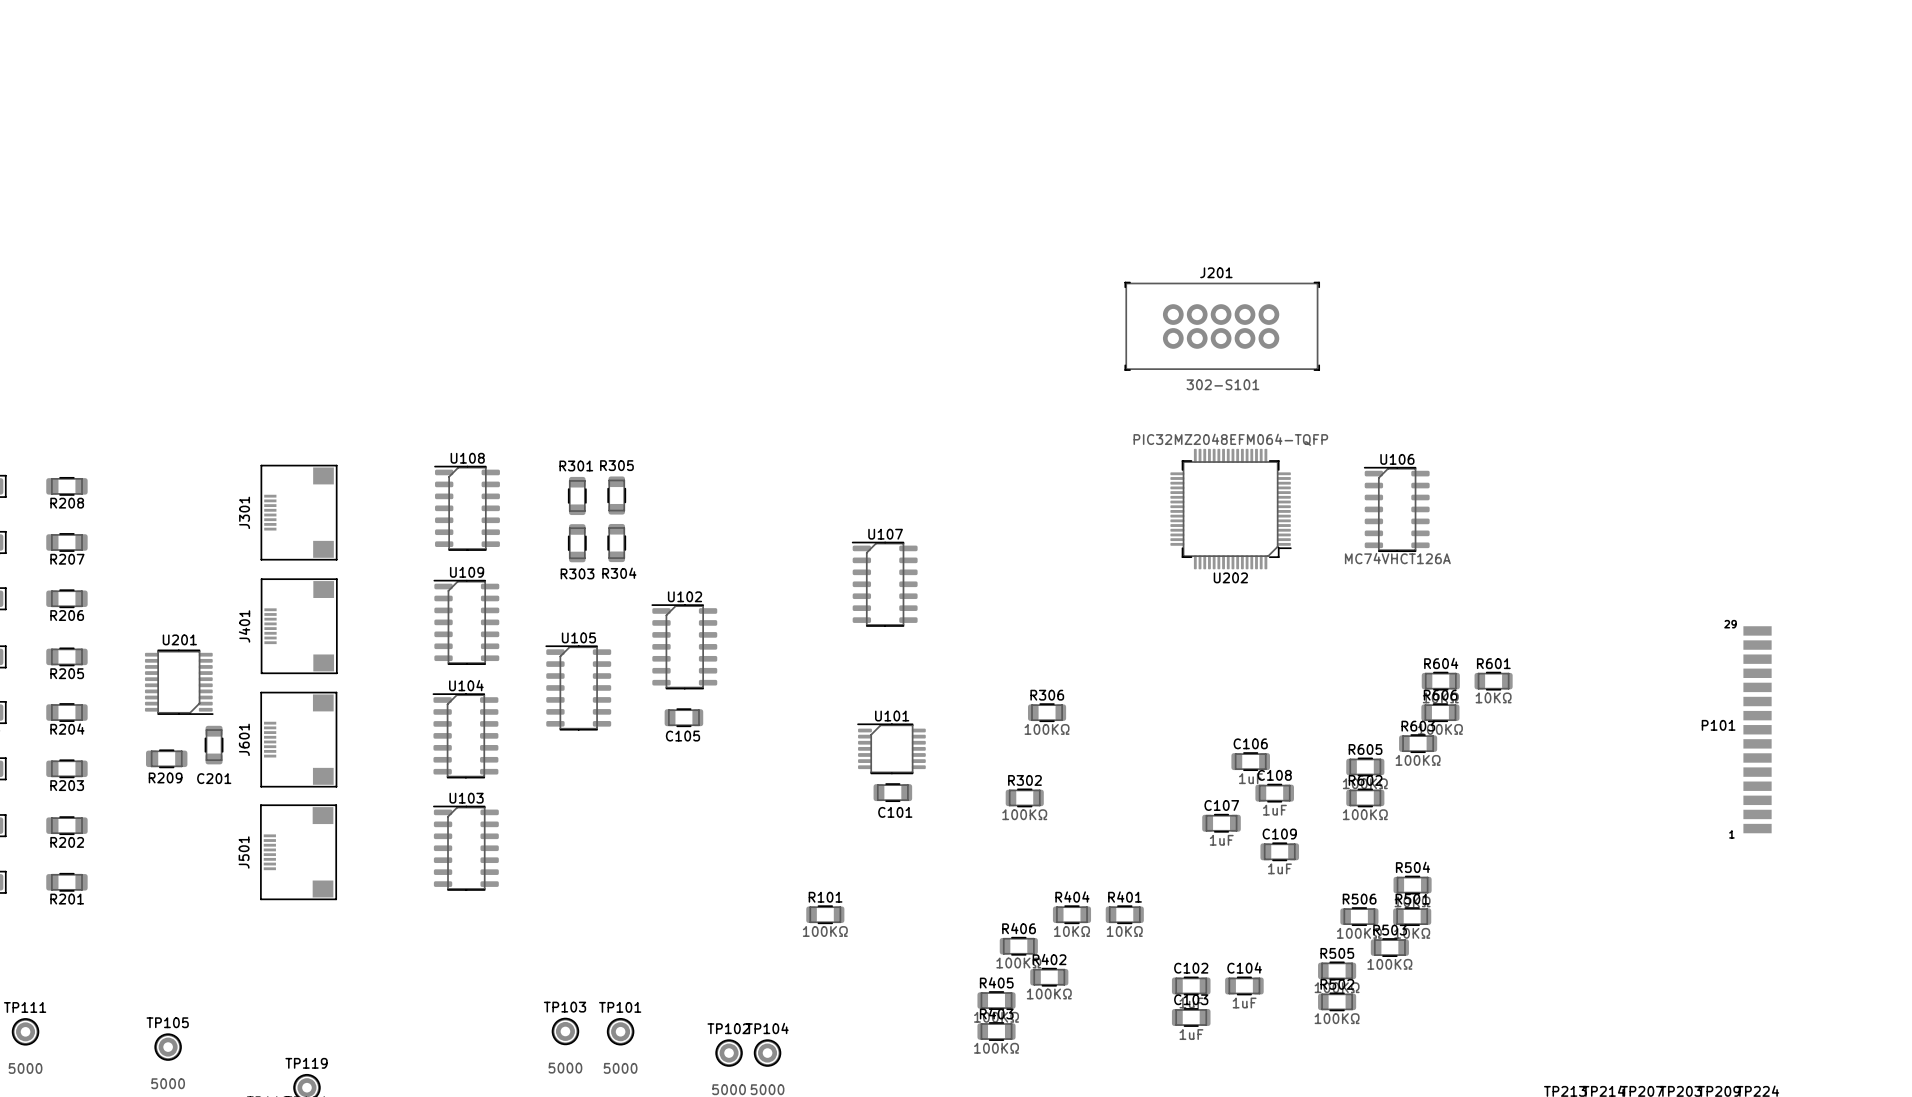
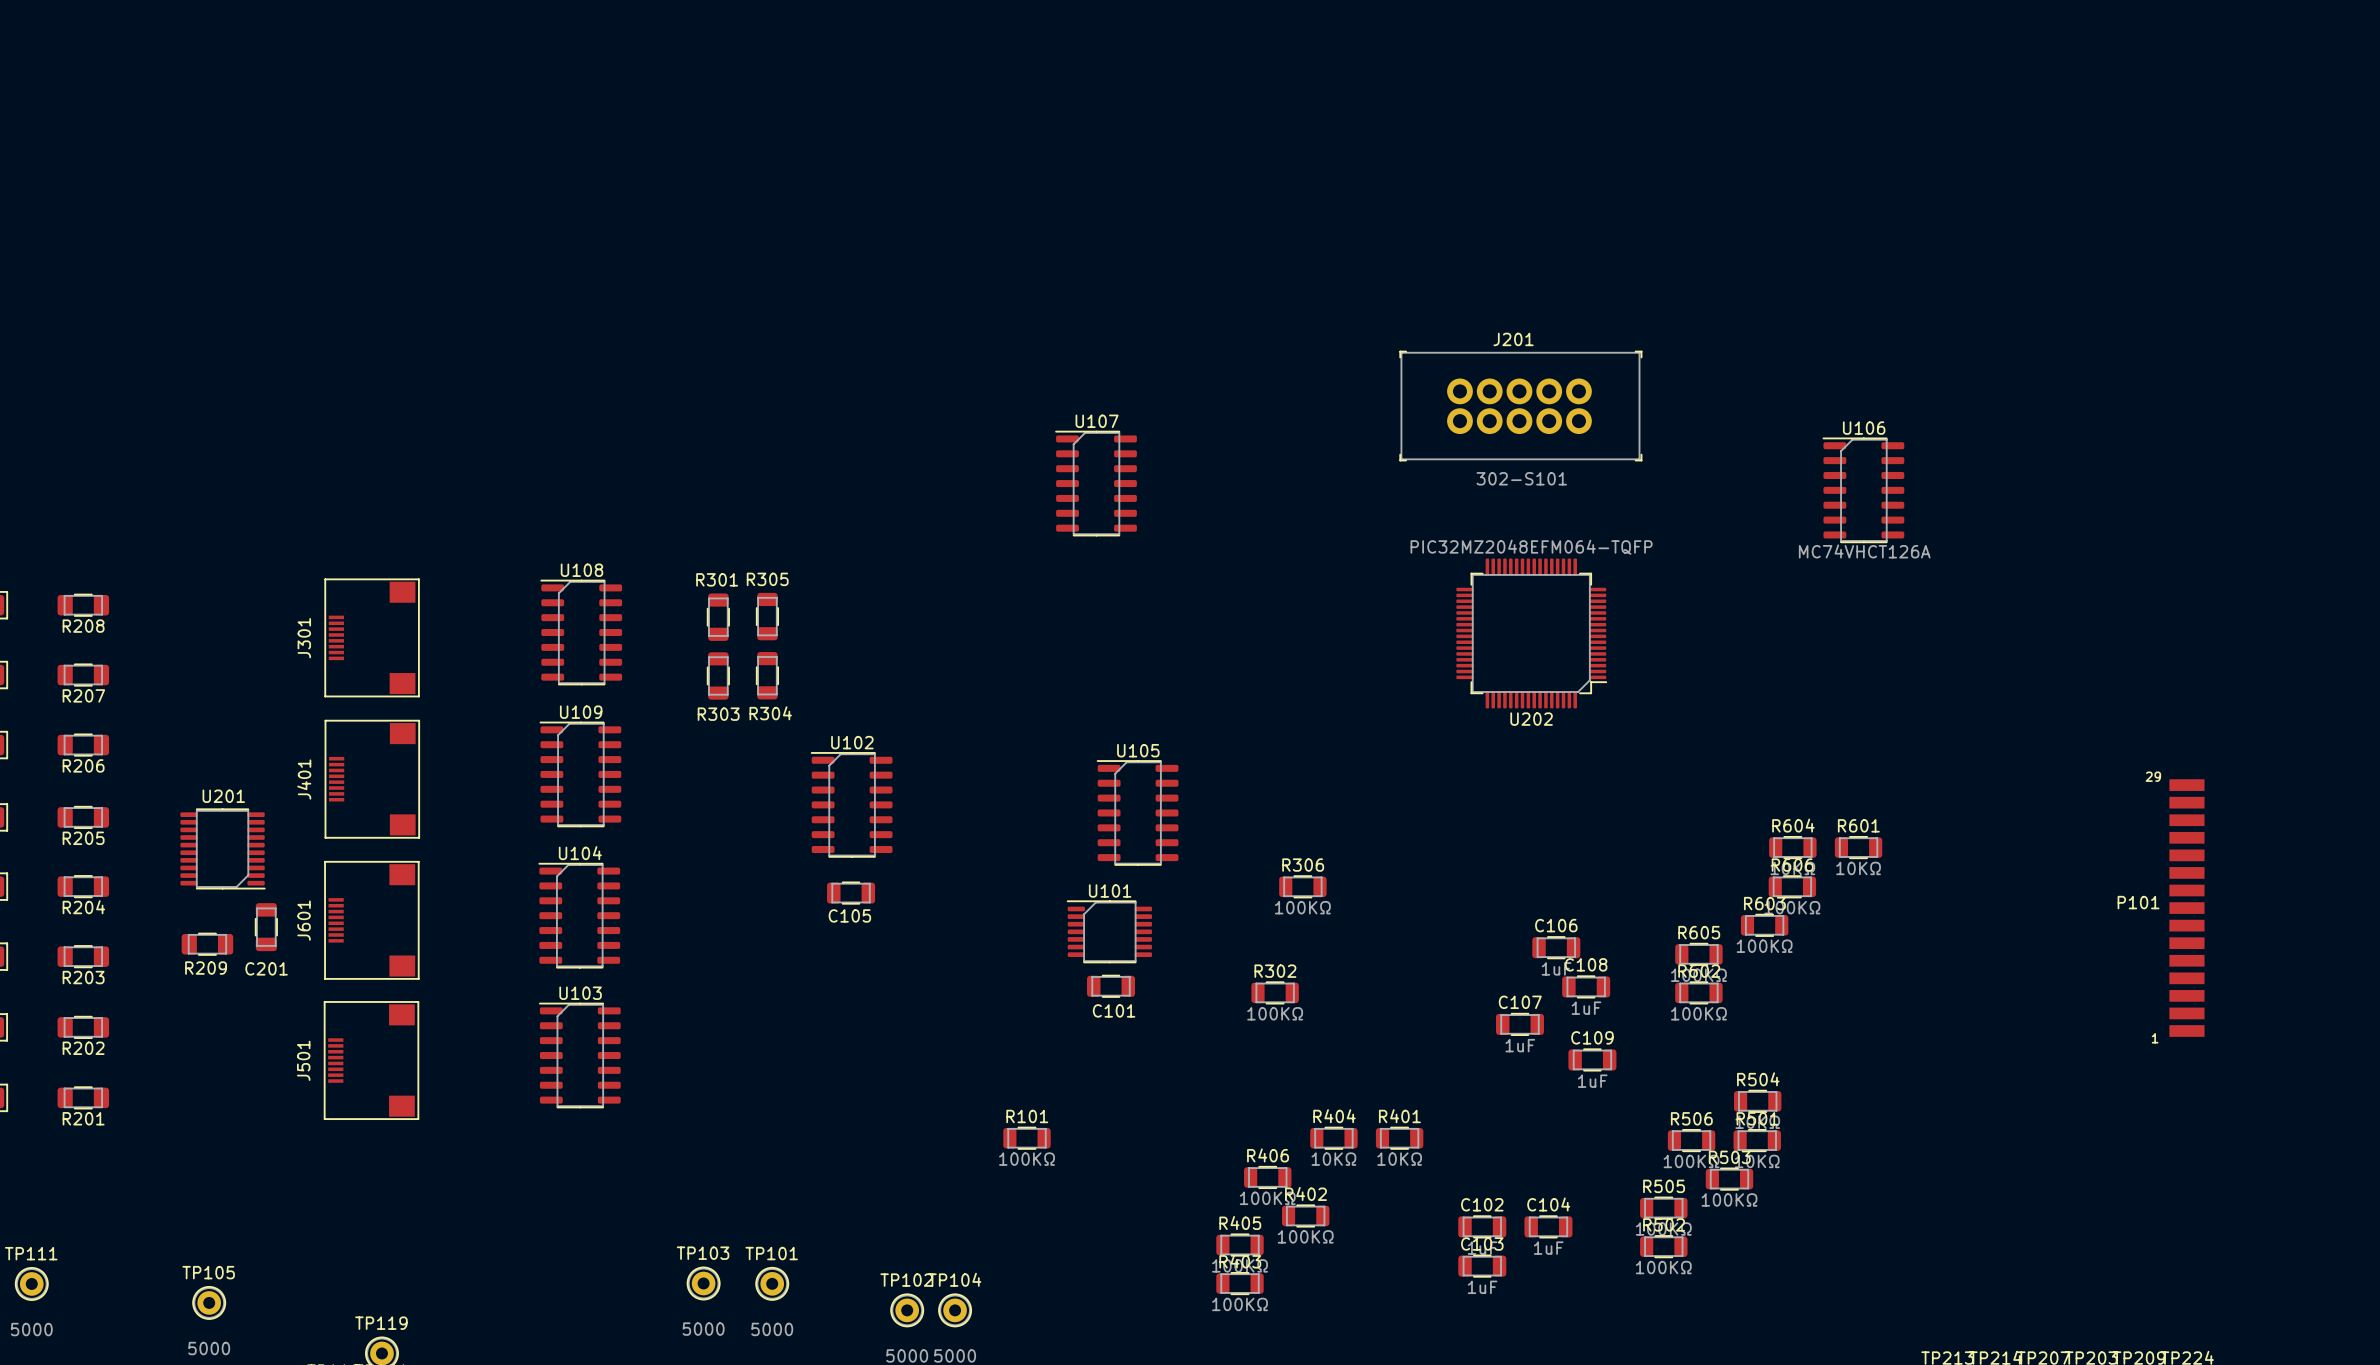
U106 position: (1396, 509) -> (1863, 490)
U107 position: (884, 584) -> (1096, 483)
U105 position: (578, 687) -> (1137, 812)

